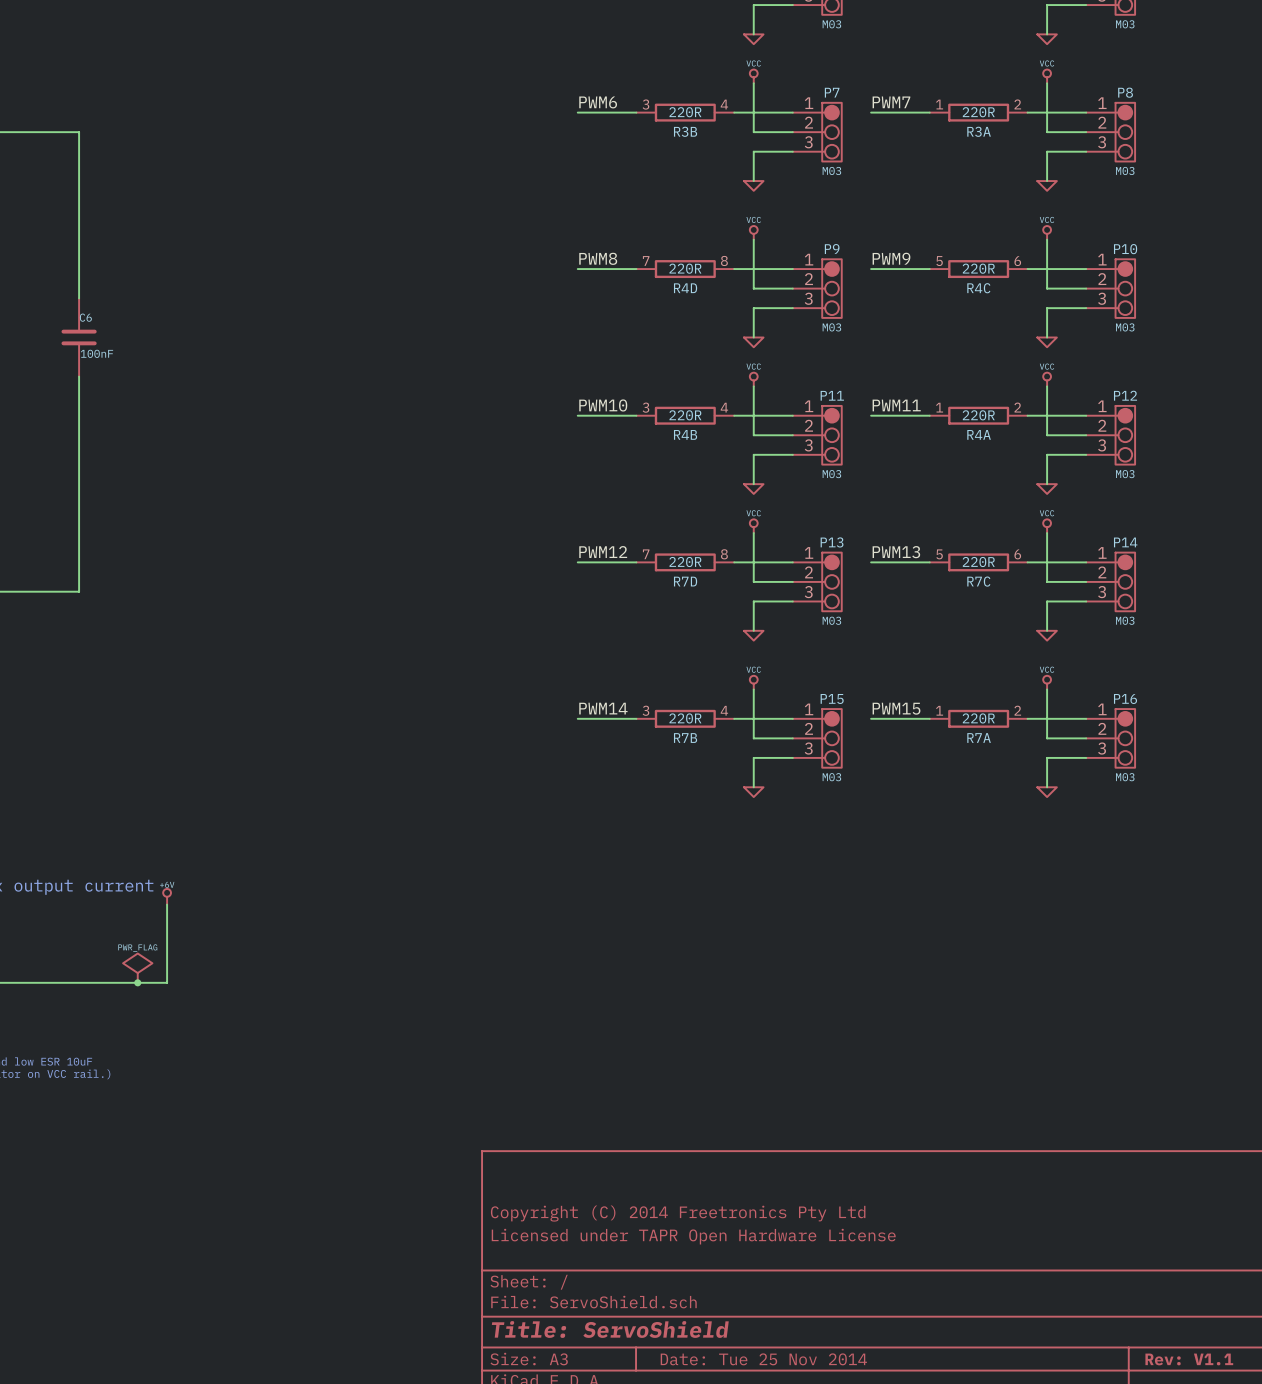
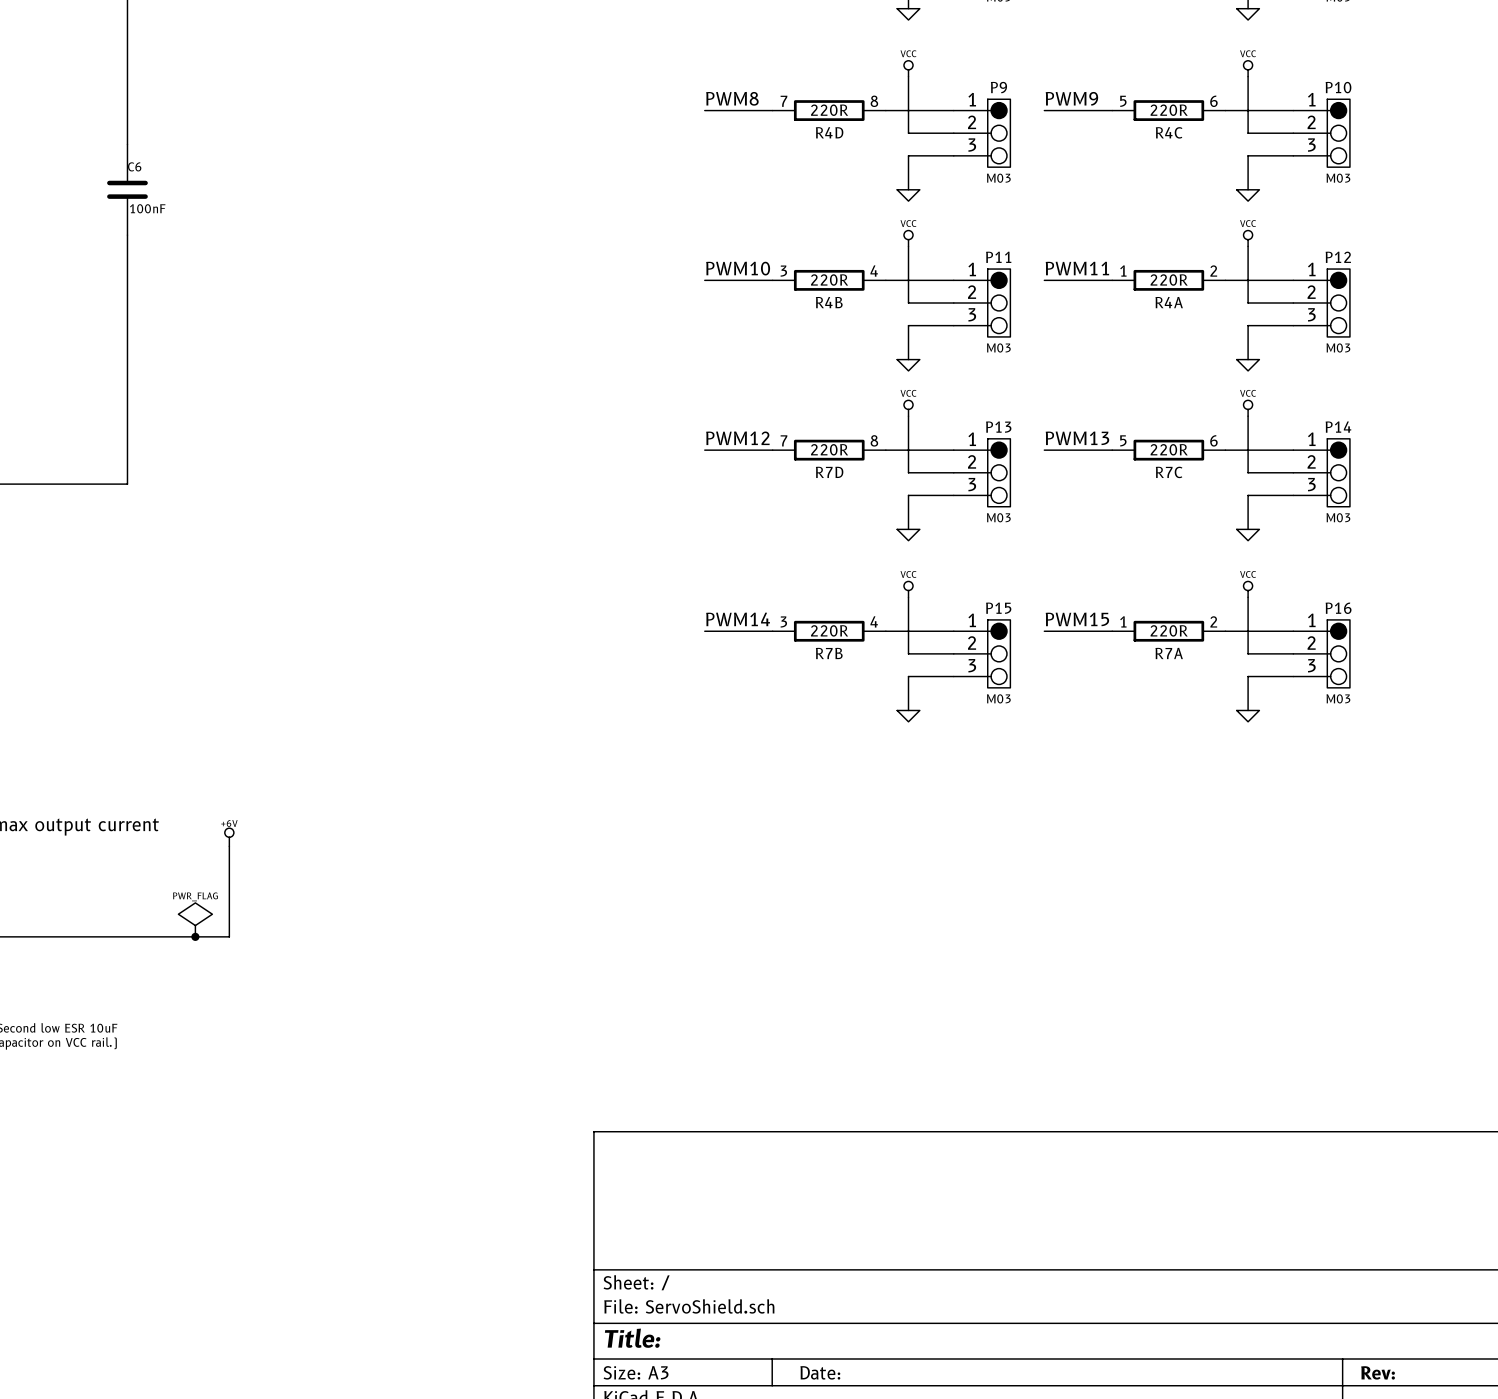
title block: Copyright (C) 2014 Freetronics Pty Ltd (678, 1213) -> none
title block: Licensed under TAPR Open Hardware License (693, 1236) -> none
title block: Title: ServoShield (610, 1329) -> Title: (632, 1338)
title block: Date: Tue 25 Nov 2014 (763, 1359) -> Date: (820, 1372)
title block: Rev: V1.1 (1189, 1359) -> Rev: (1378, 1372)

